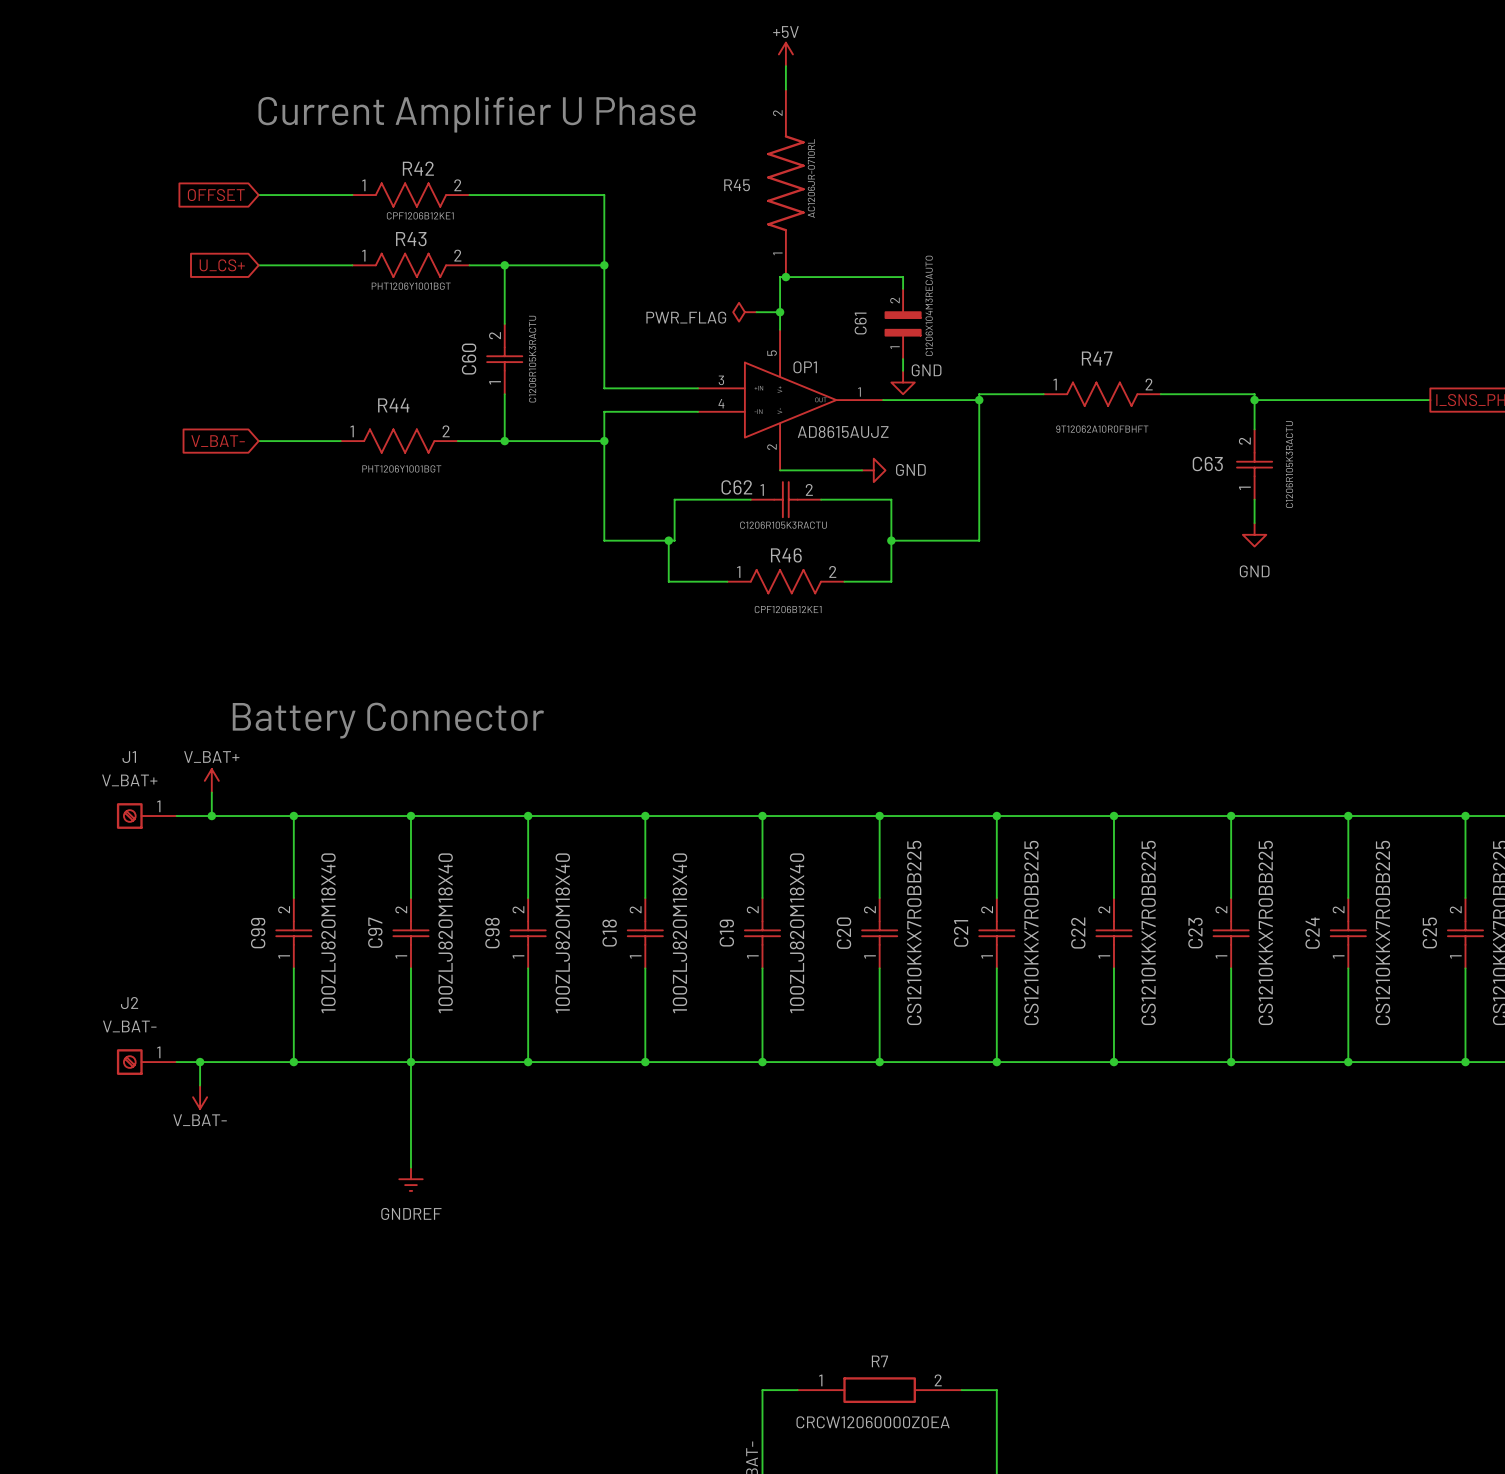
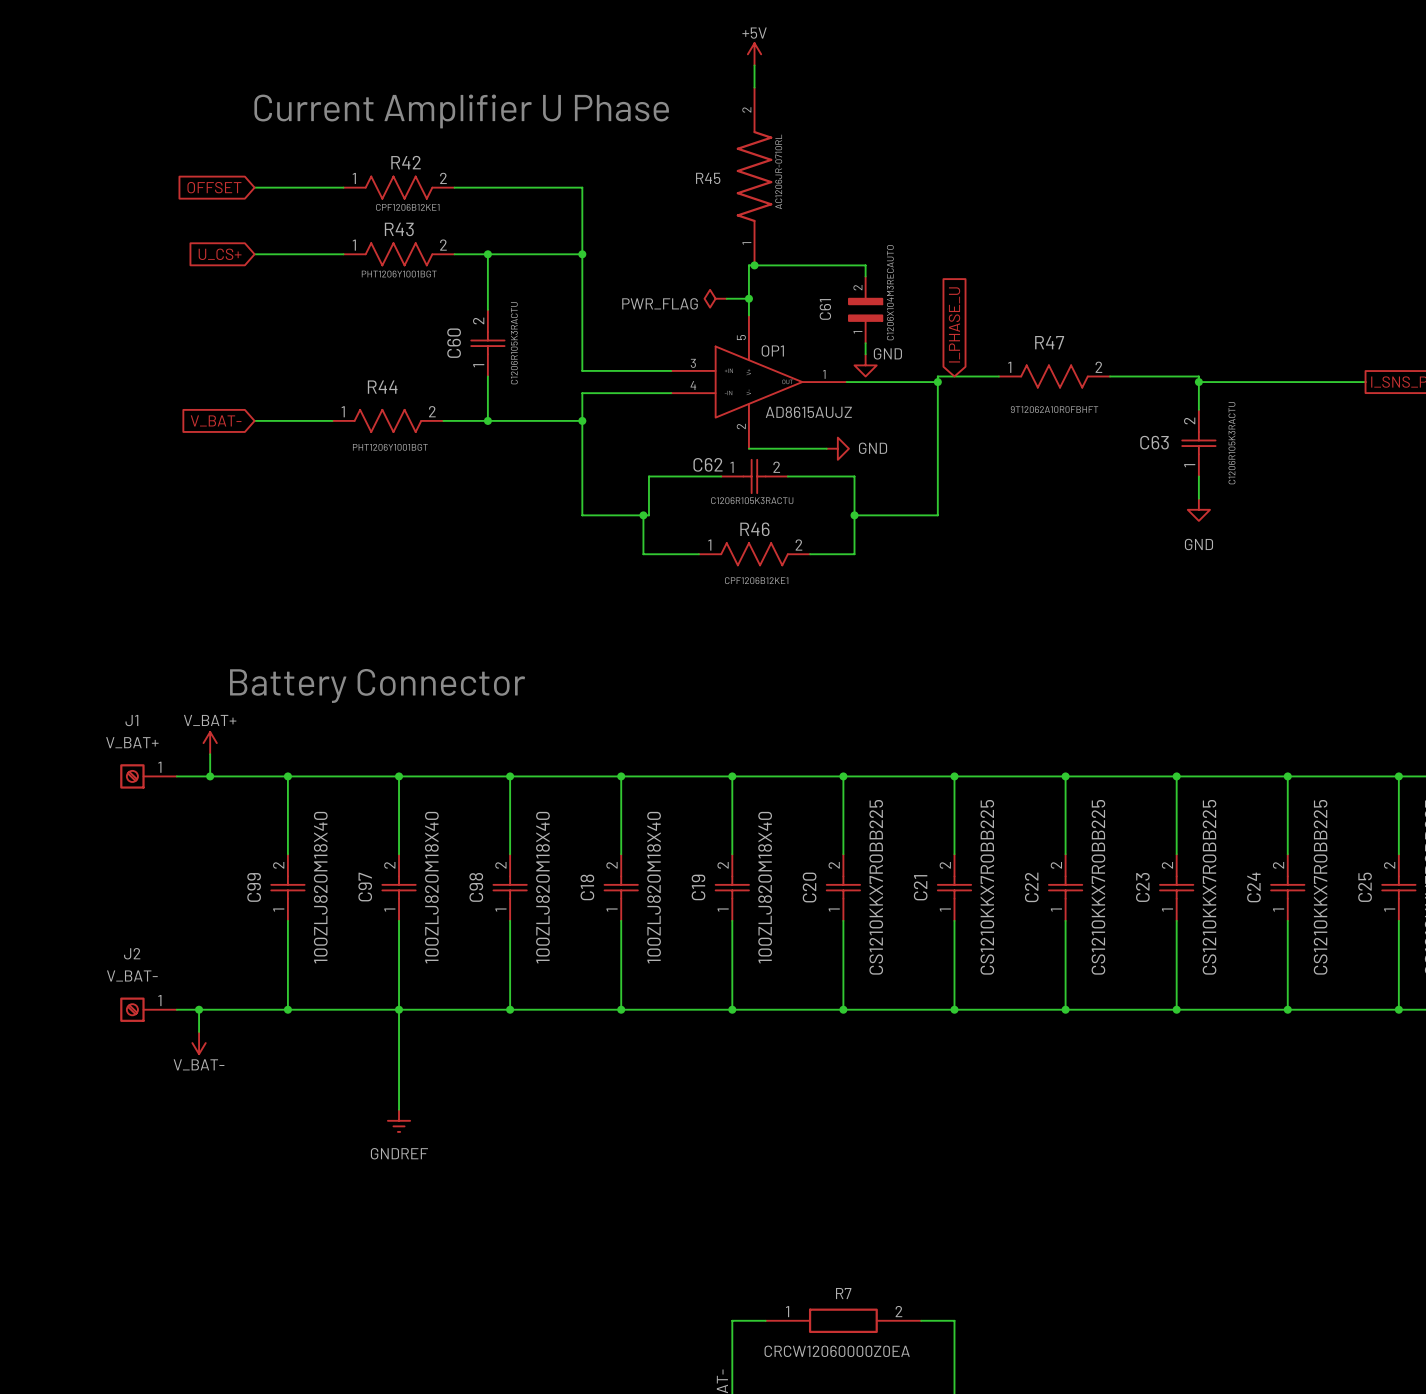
global label: none -> I_PHASE_U (954, 324)

